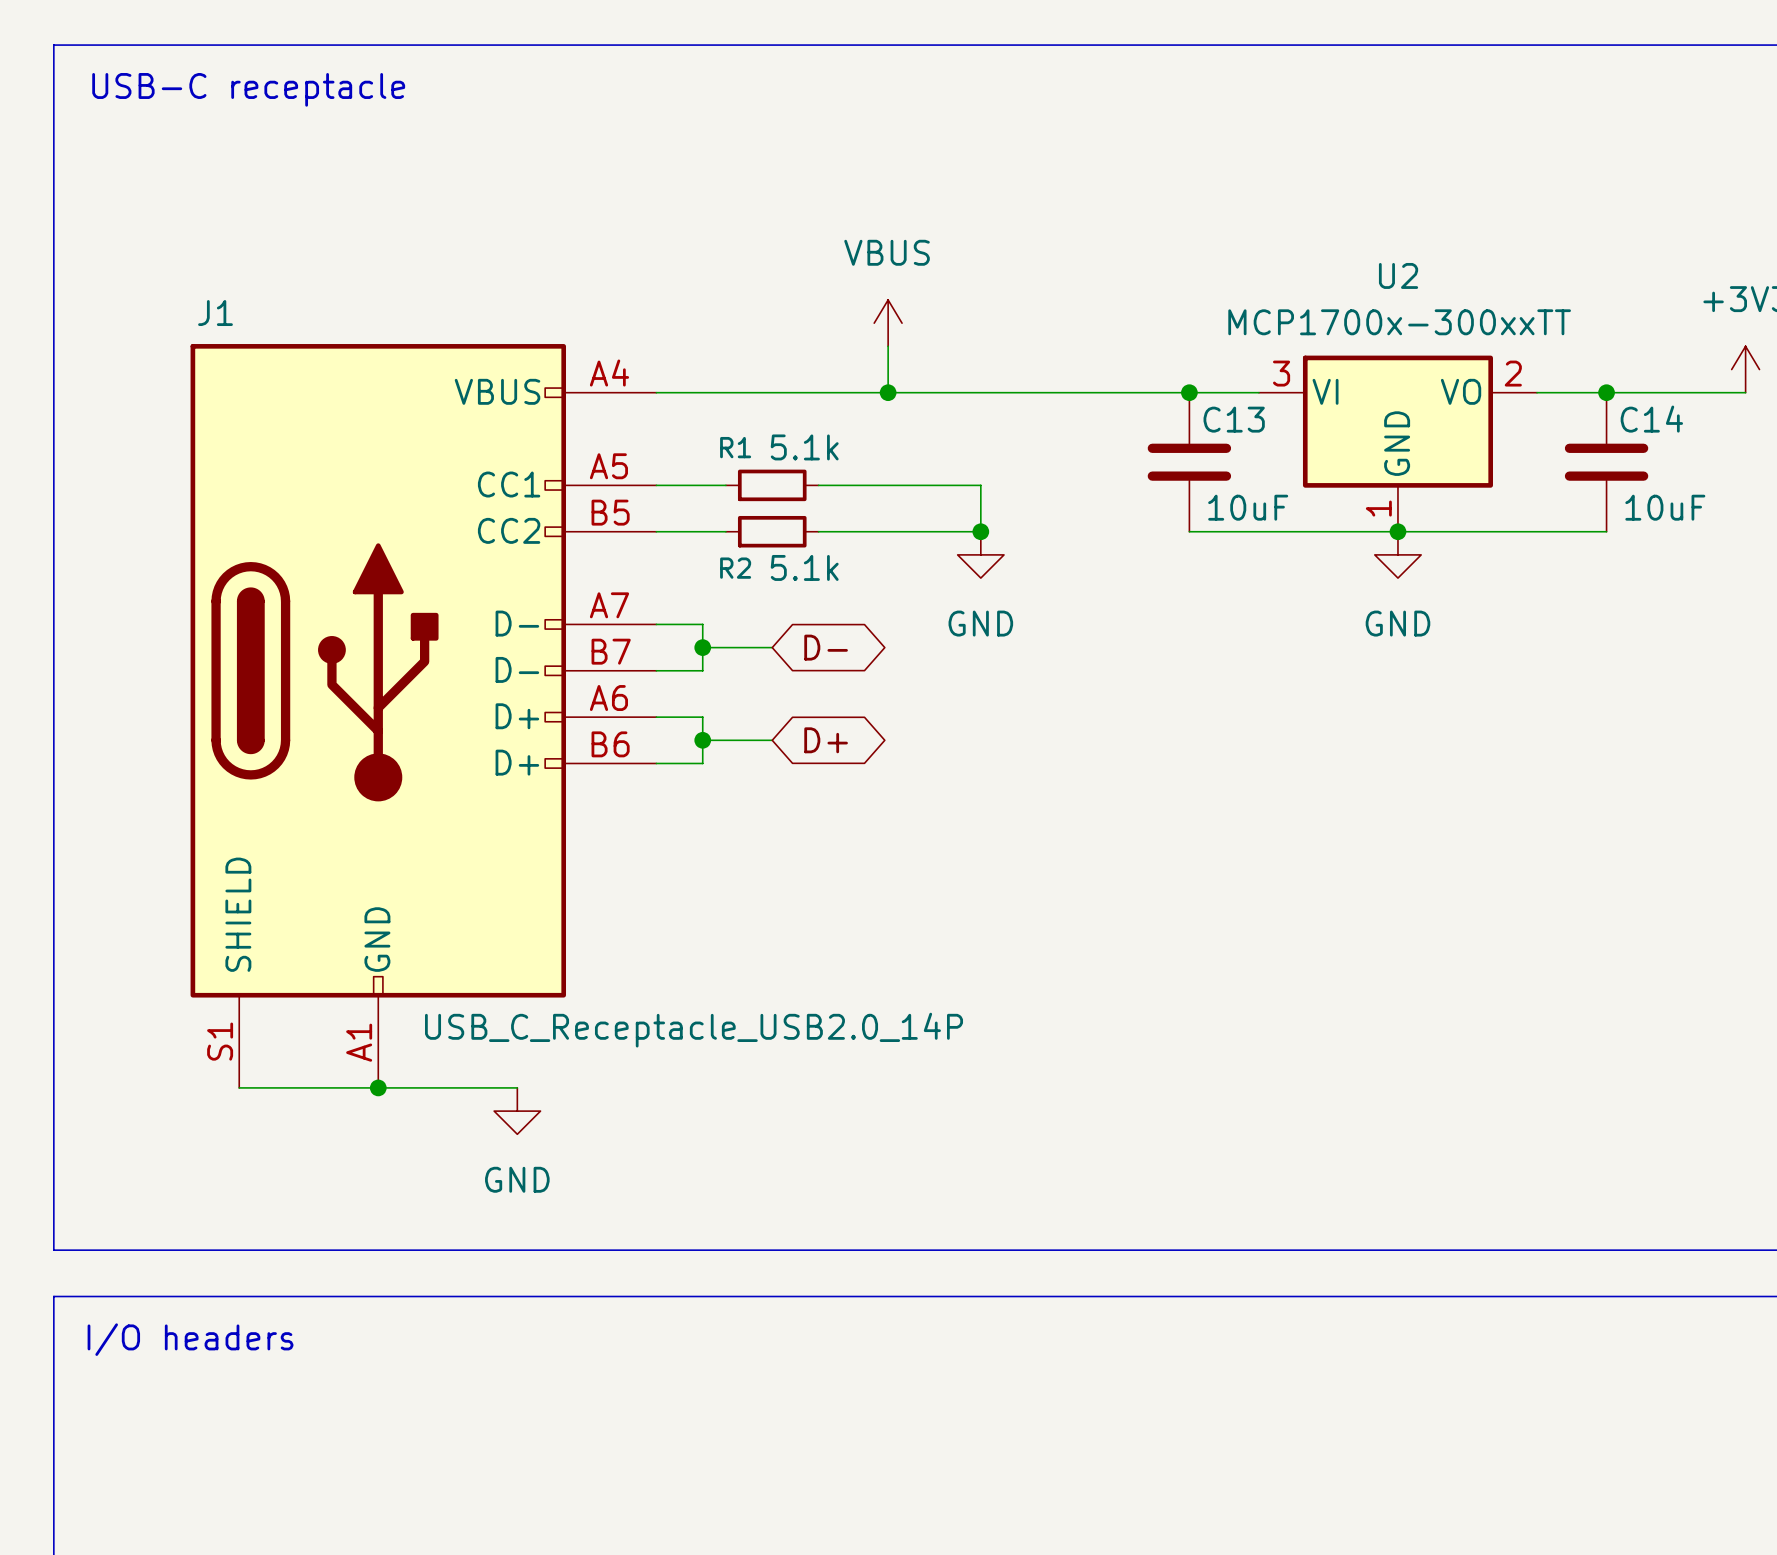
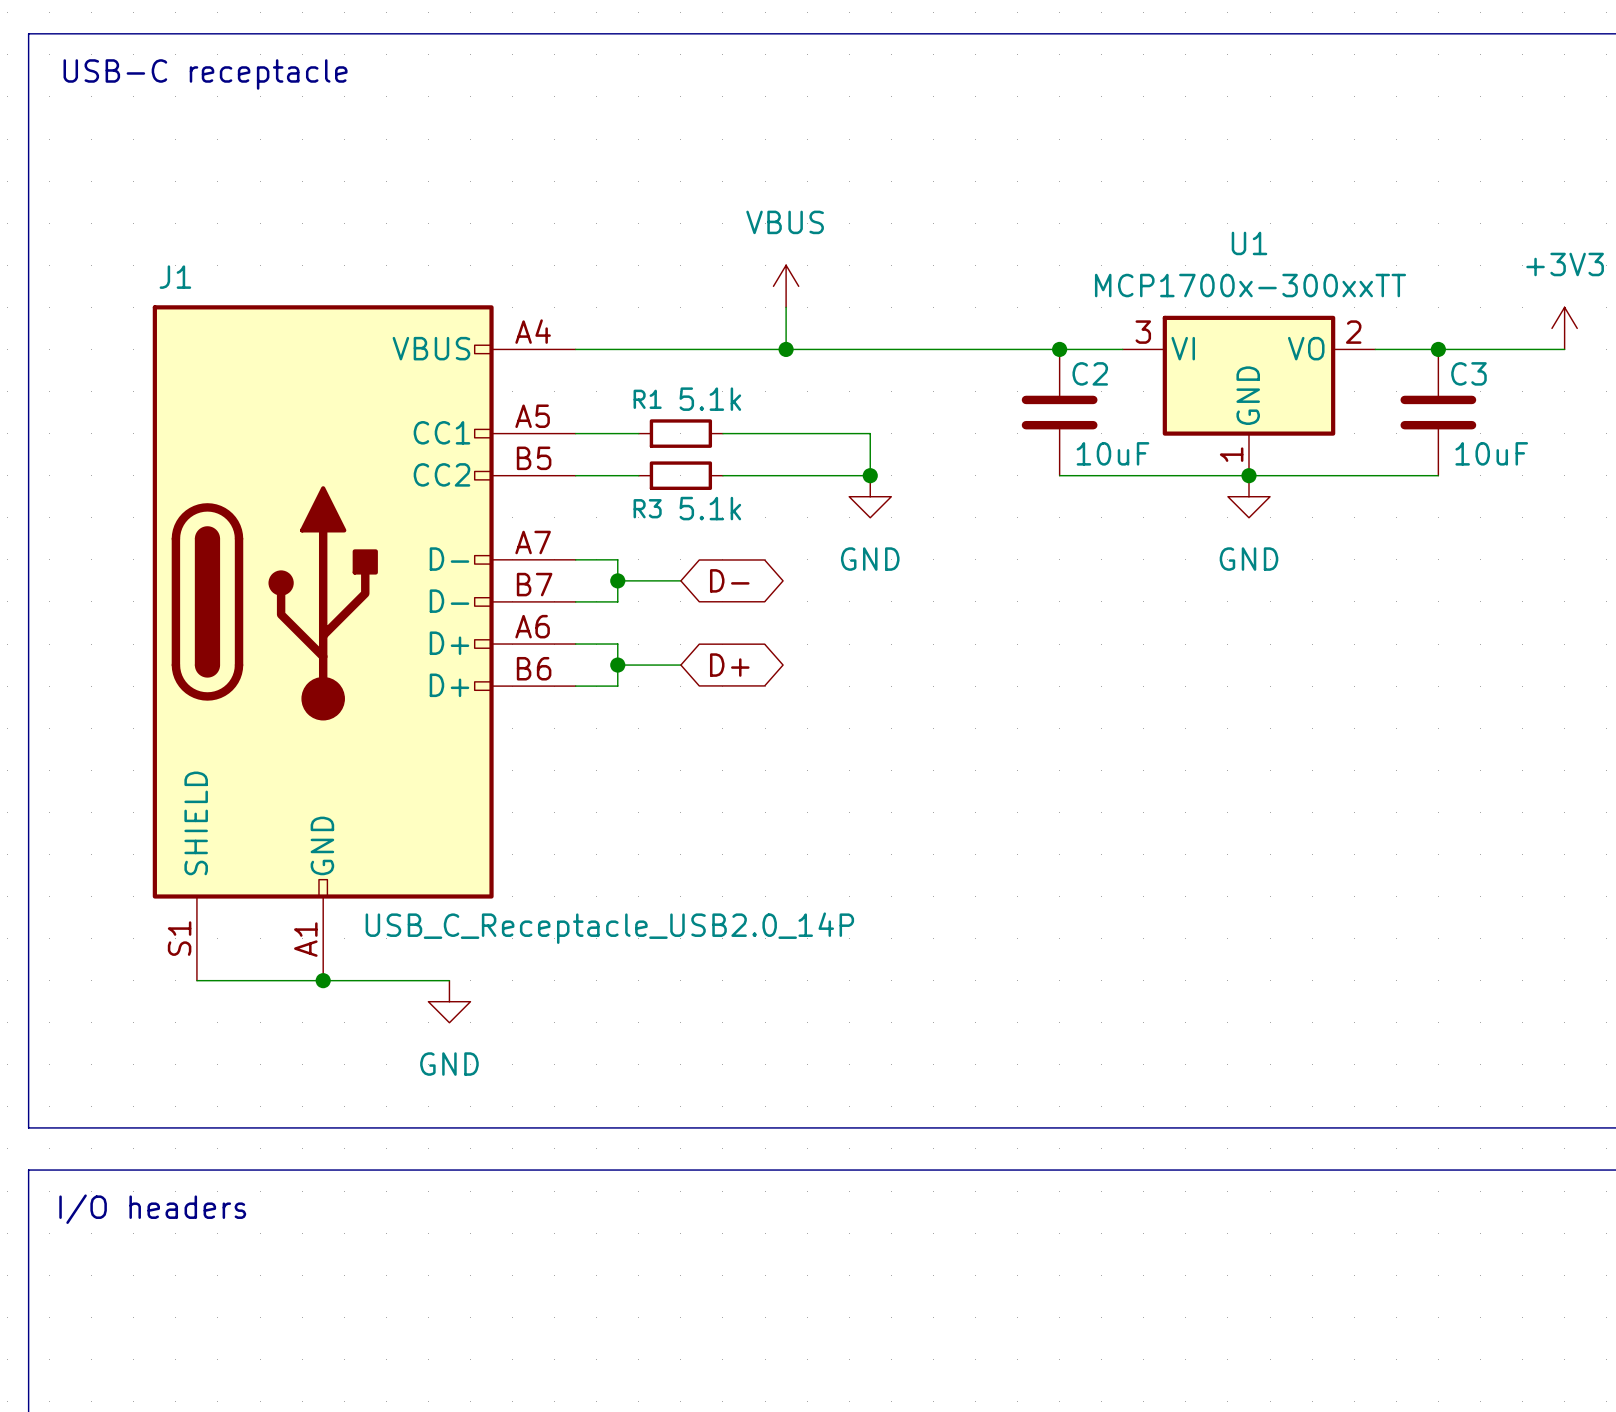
U2 name: U2 (1398, 275) -> U1 (1249, 243)
C13 name: C13 (1234, 419) -> C2 (1090, 373)
C14 name: C14 (1651, 419) -> C3 (1468, 373)
R2 name: R2 (735, 568) -> R3 (647, 508)

